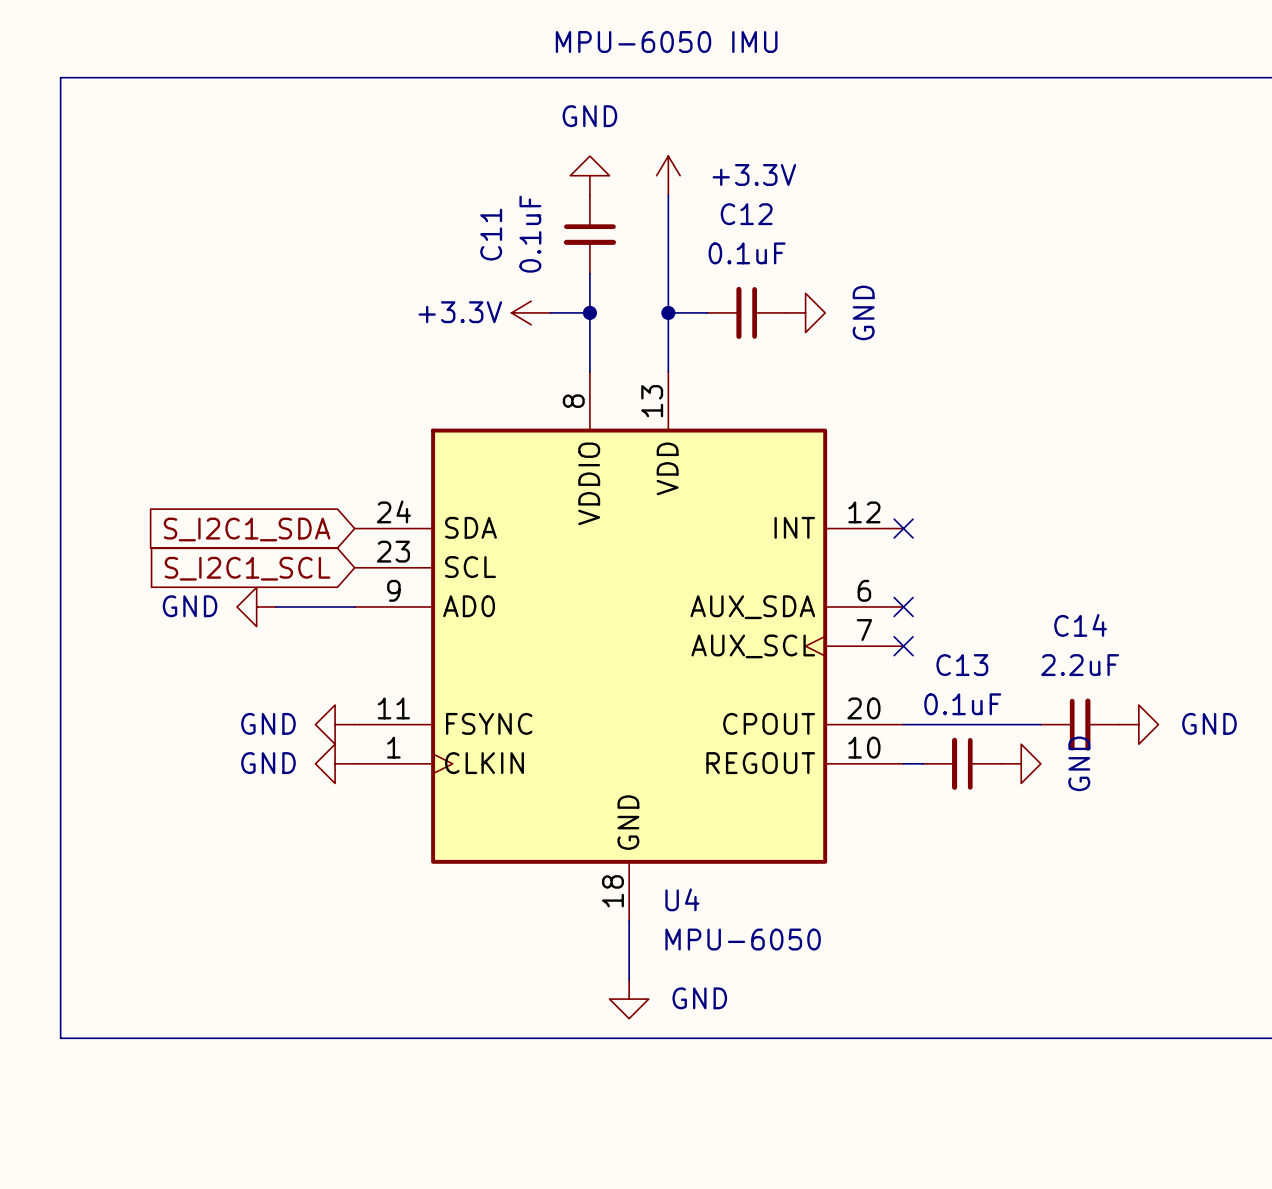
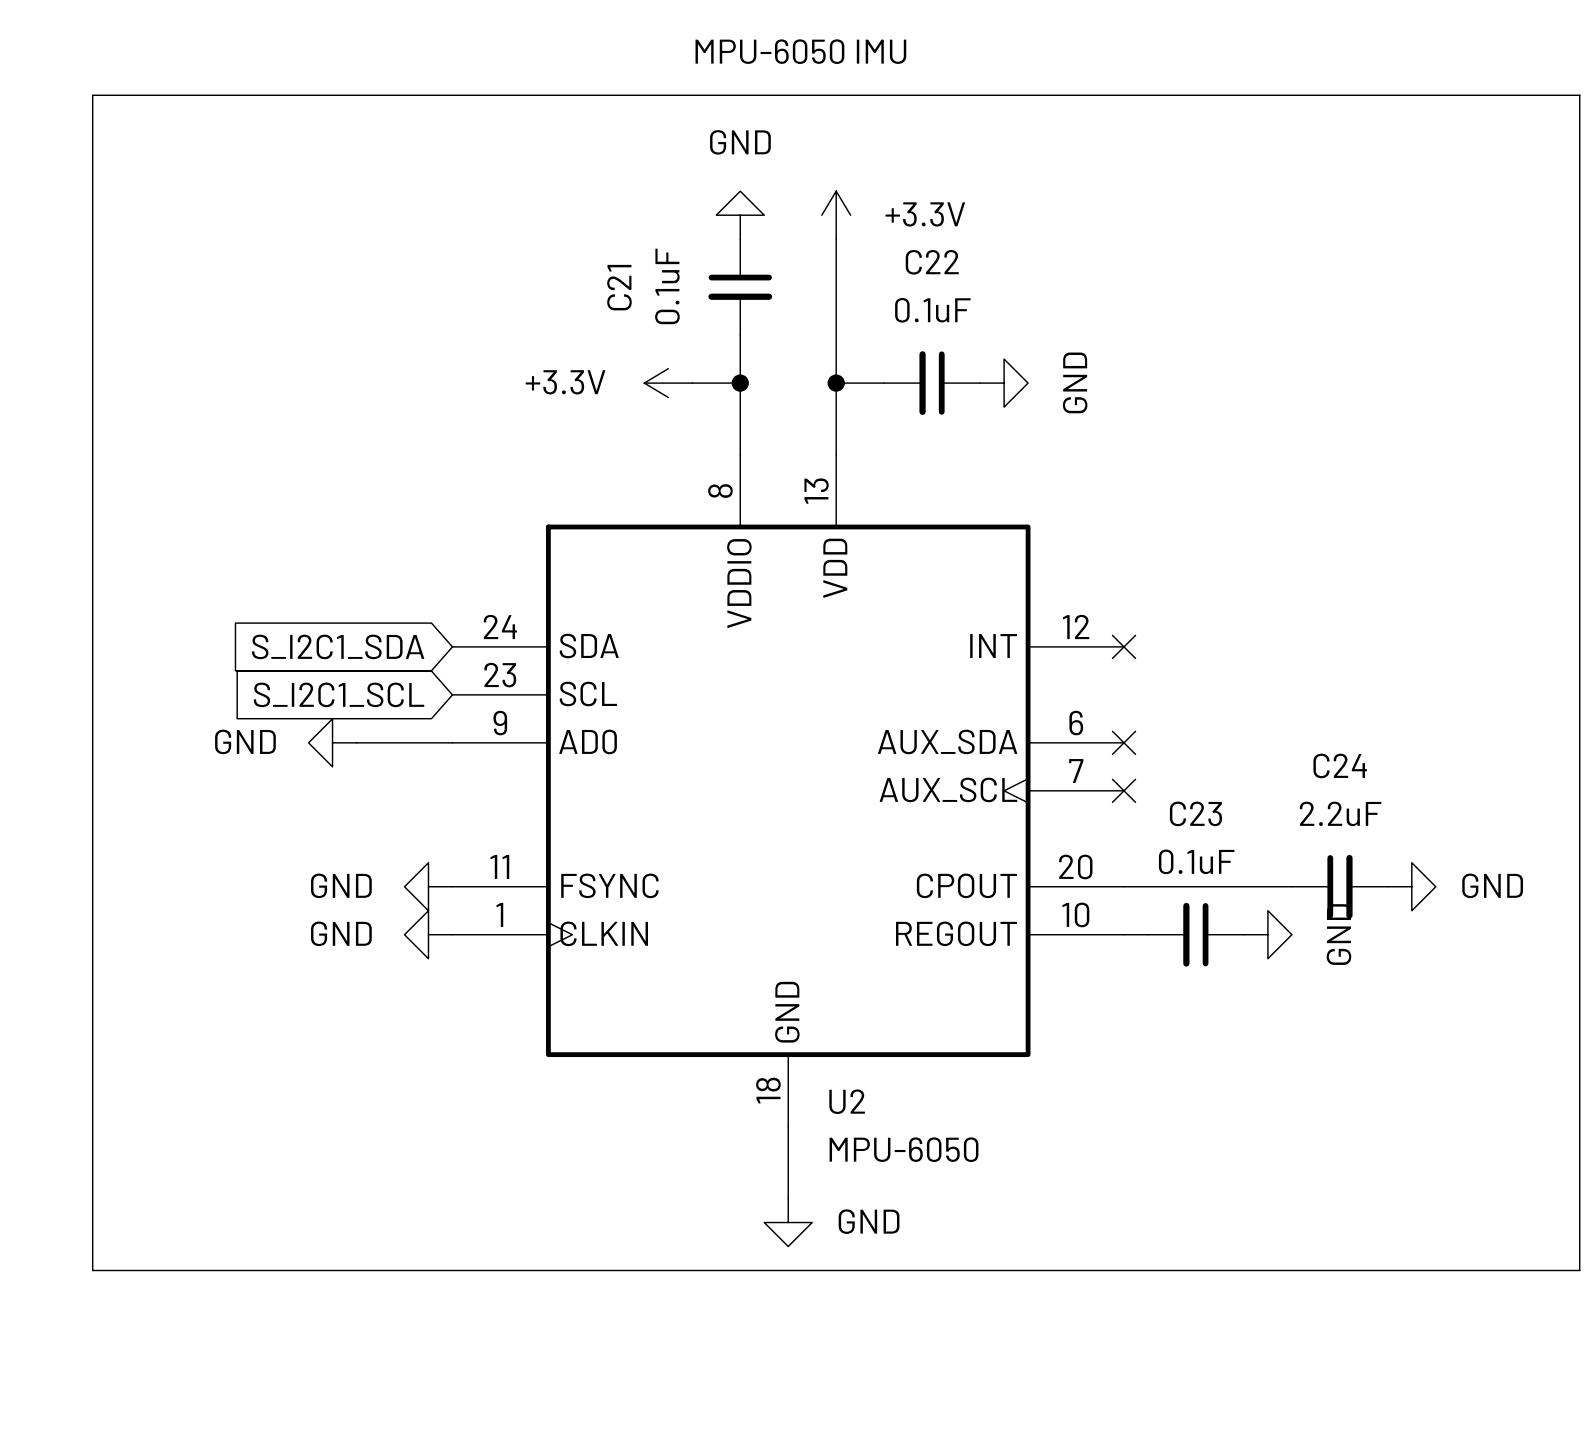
C12 name: C12 (746, 214) -> C22 (932, 262)
C11 name: C11 (491, 234) -> C21 (619, 287)
C14 name: C14 (1080, 625) -> C24 (1340, 765)
C13 name: C13 (962, 665) -> C23 (1195, 813)
U4 name: U4 (682, 899) -> U2 (847, 1101)

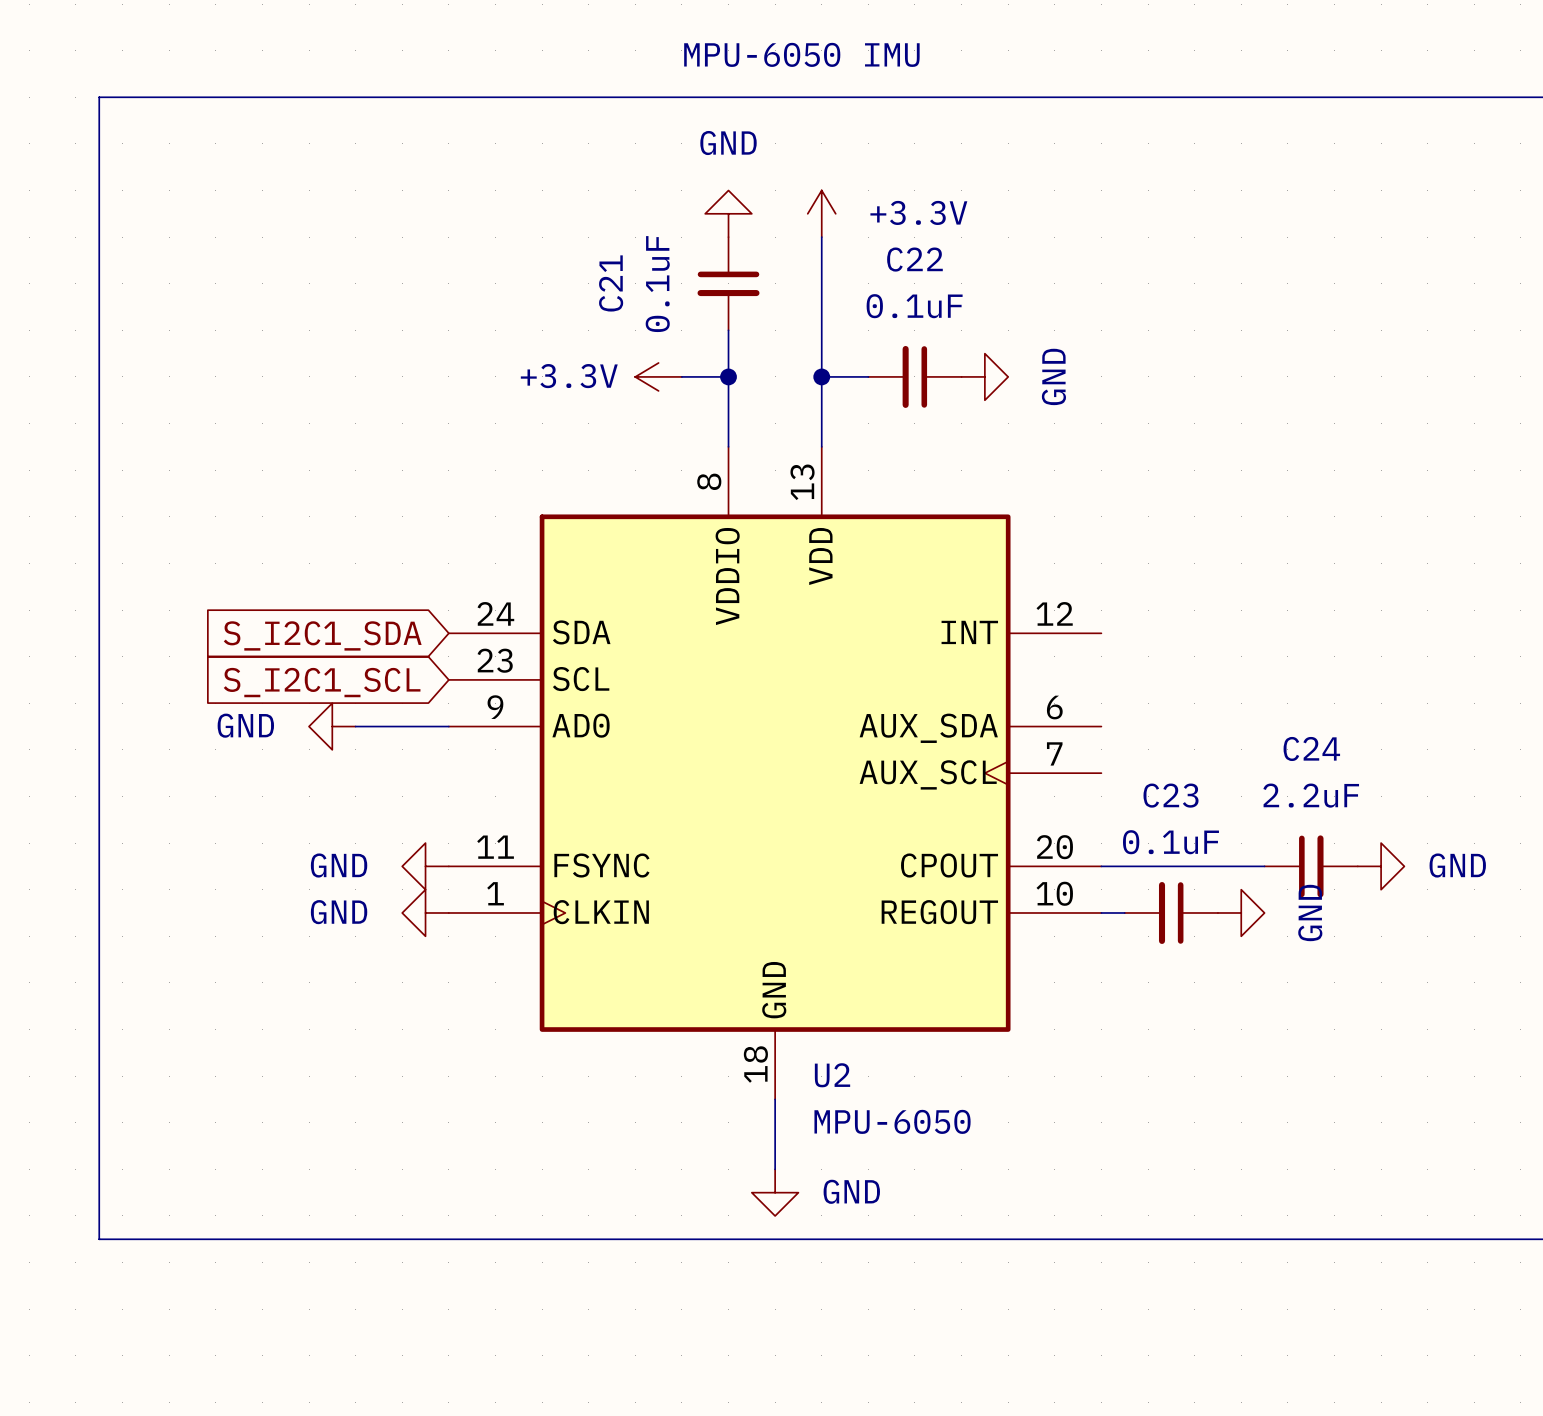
no-connect mark: (1124, 646) -> none
no-connect mark: (1124, 742) -> none
no-connect mark: (1124, 790) -> none

